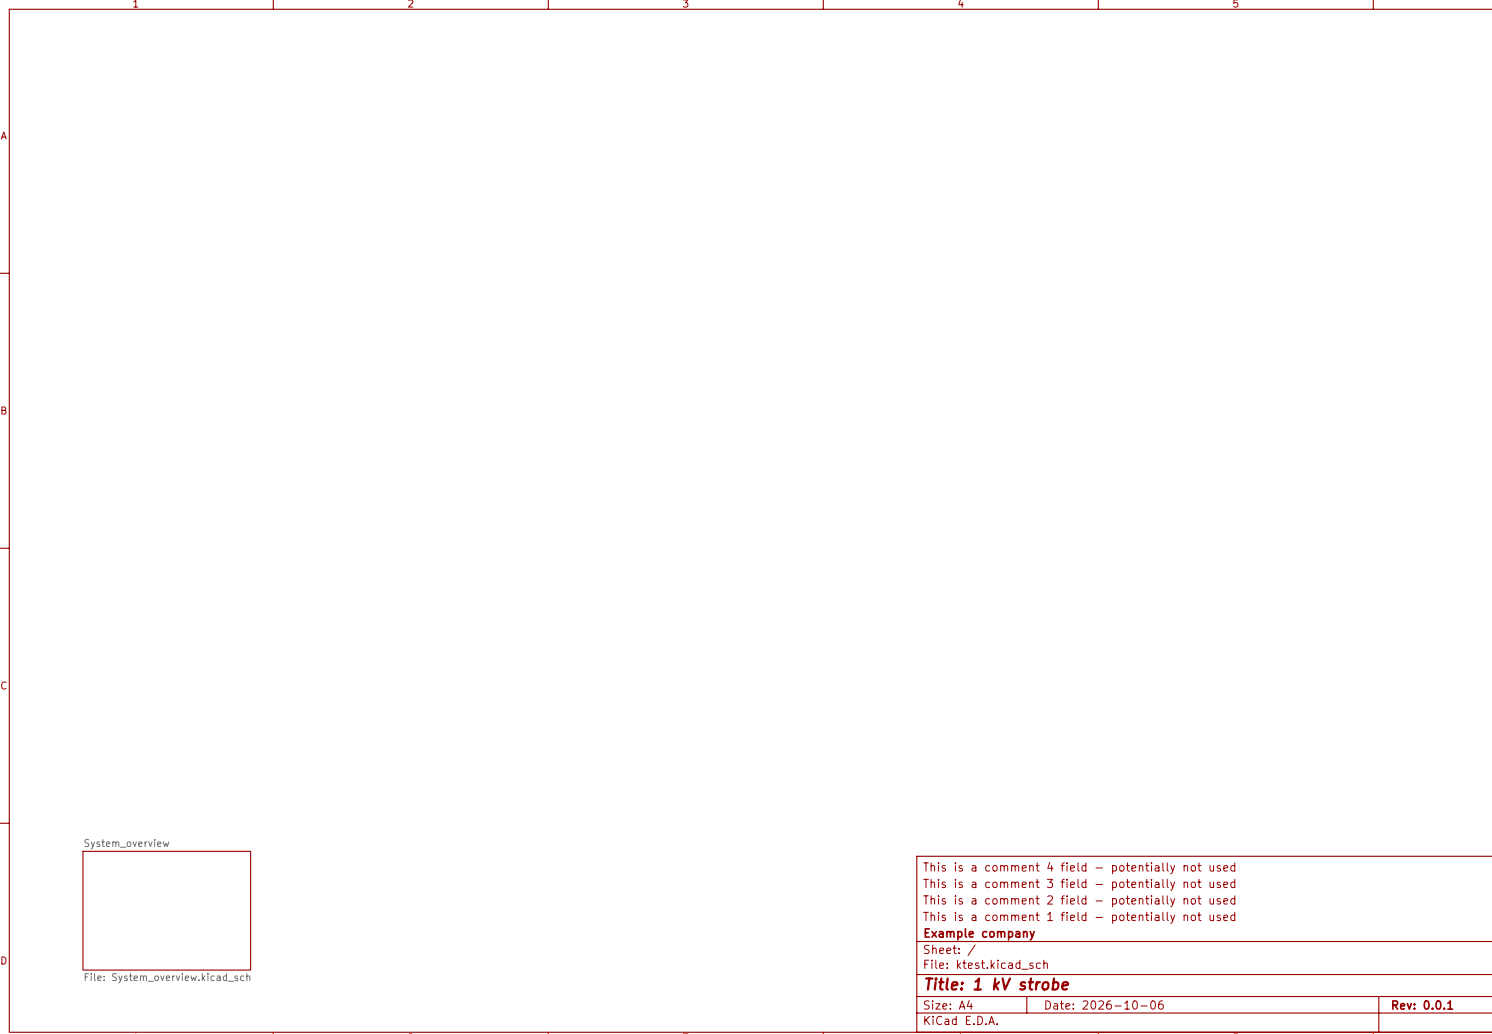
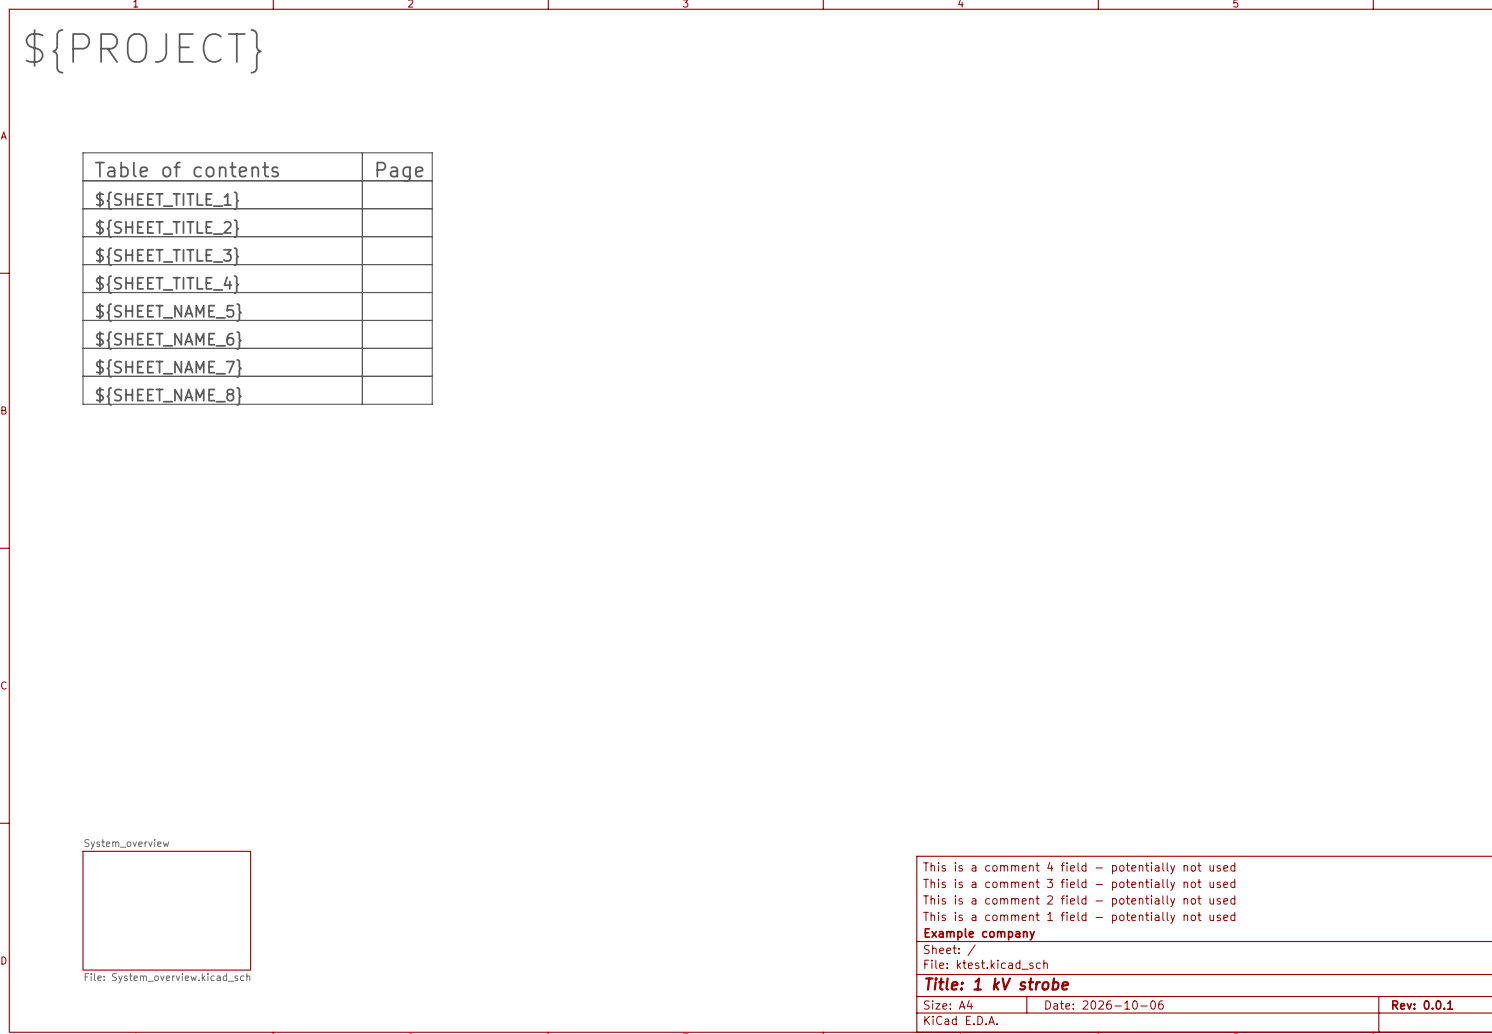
text: none -> ${PROJECT} (143, 51)
line: none -> (82, 152) (432, 152) (432, 404) (82, 404) (82, 152)
line: none -> (362, 152) (362, 404)
text: none -> Table of contents (187, 169)
text: none -> Page (399, 171)
line: none -> (82, 180) (432, 180)
text: none -> ${SHEET_TITLE_1} (167, 200)
line: none -> (82, 208) (432, 208)
text: none -> ${SHEET_TITLE_2} (167, 228)
line: none -> (82, 236) (432, 236)
text: none -> ${SHEET_TITLE_3} (167, 256)
line: none -> (82, 264) (432, 264)
text: none -> ${SHEET_TITLE_4} (167, 284)
line: none -> (82, 292) (432, 292)
text: none -> ${SHEET_NAME_5} (168, 312)
line: none -> (82, 320) (432, 320)
text: none -> ${SHEET_NAME_6} (168, 340)
line: none -> (82, 348) (432, 348)
text: none -> ${SHEET_NAME_7} (168, 368)
line: none -> (82, 376) (432, 376)
text: none -> ${SHEET_NAME_8} (168, 396)

